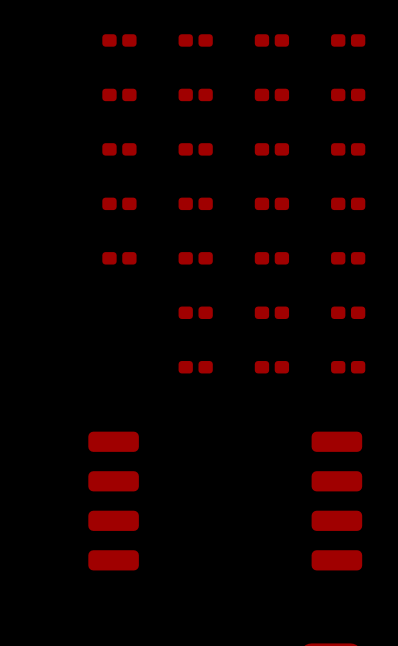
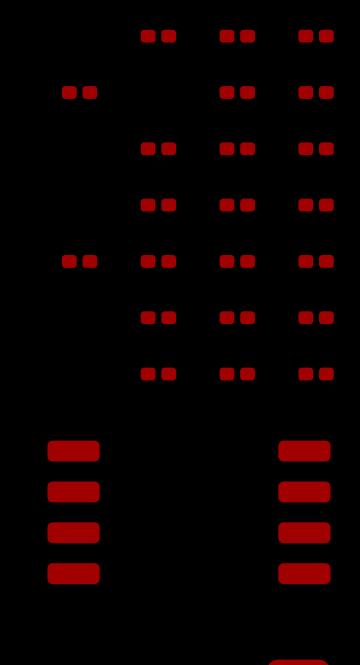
part: (119, 40) -> none
part: (195, 94) -> none
part: (119, 149) -> none
part: (119, 203) -> none

